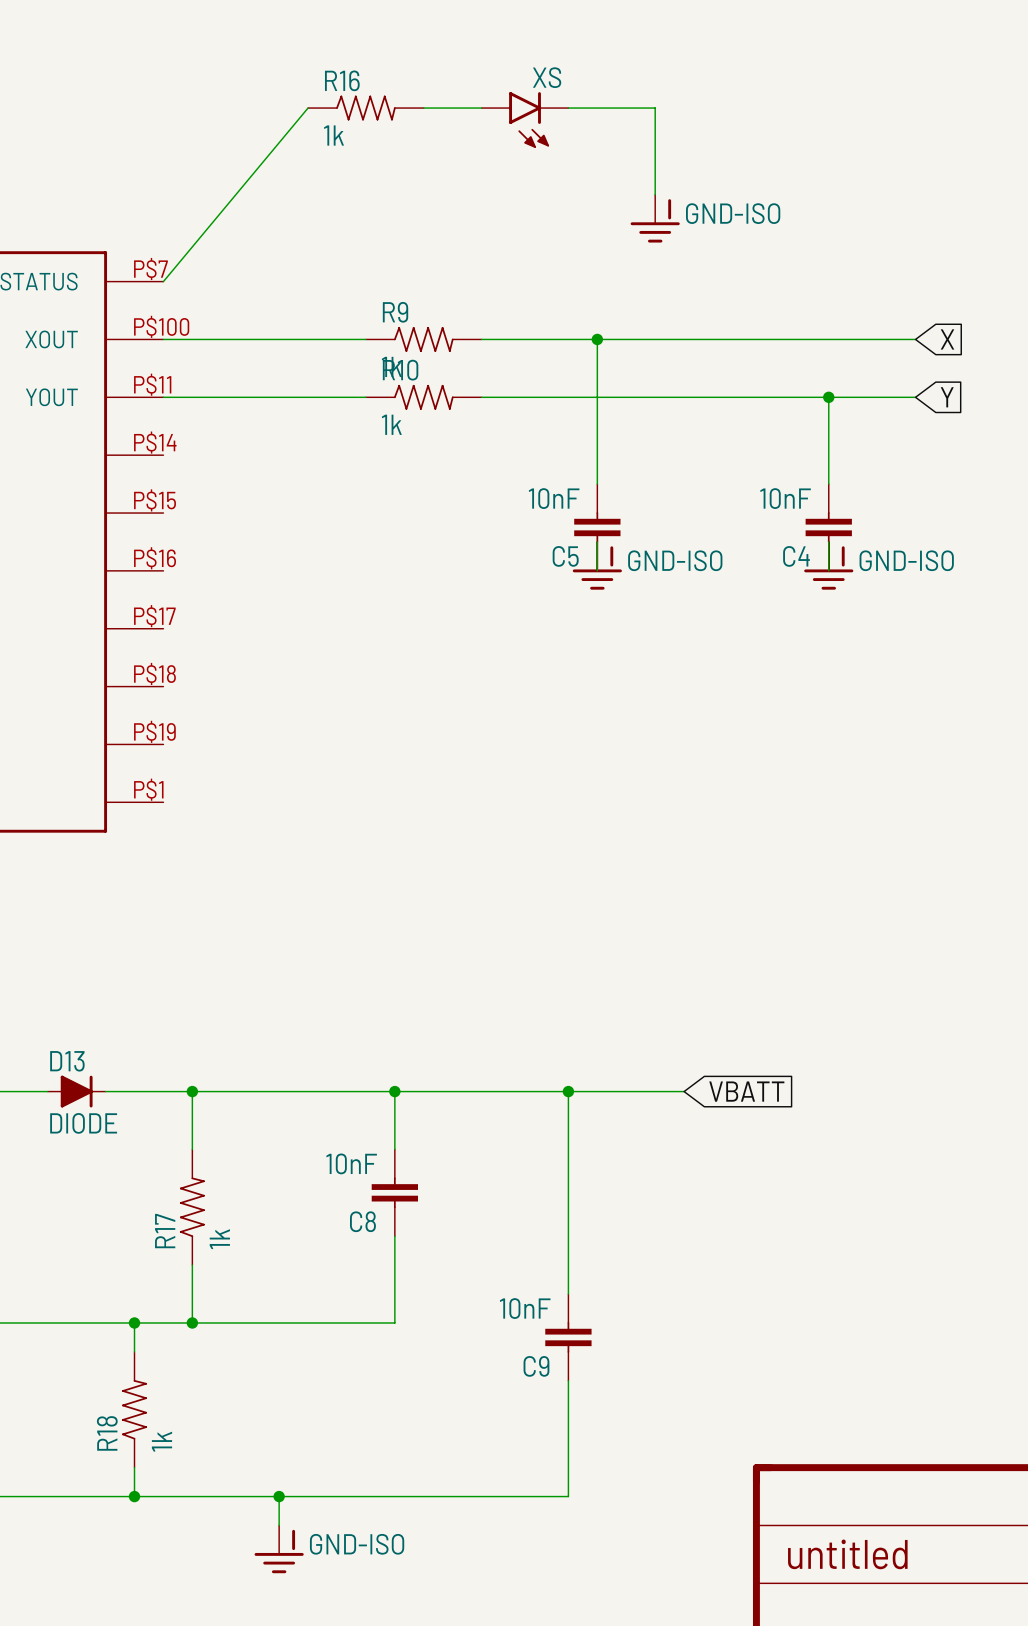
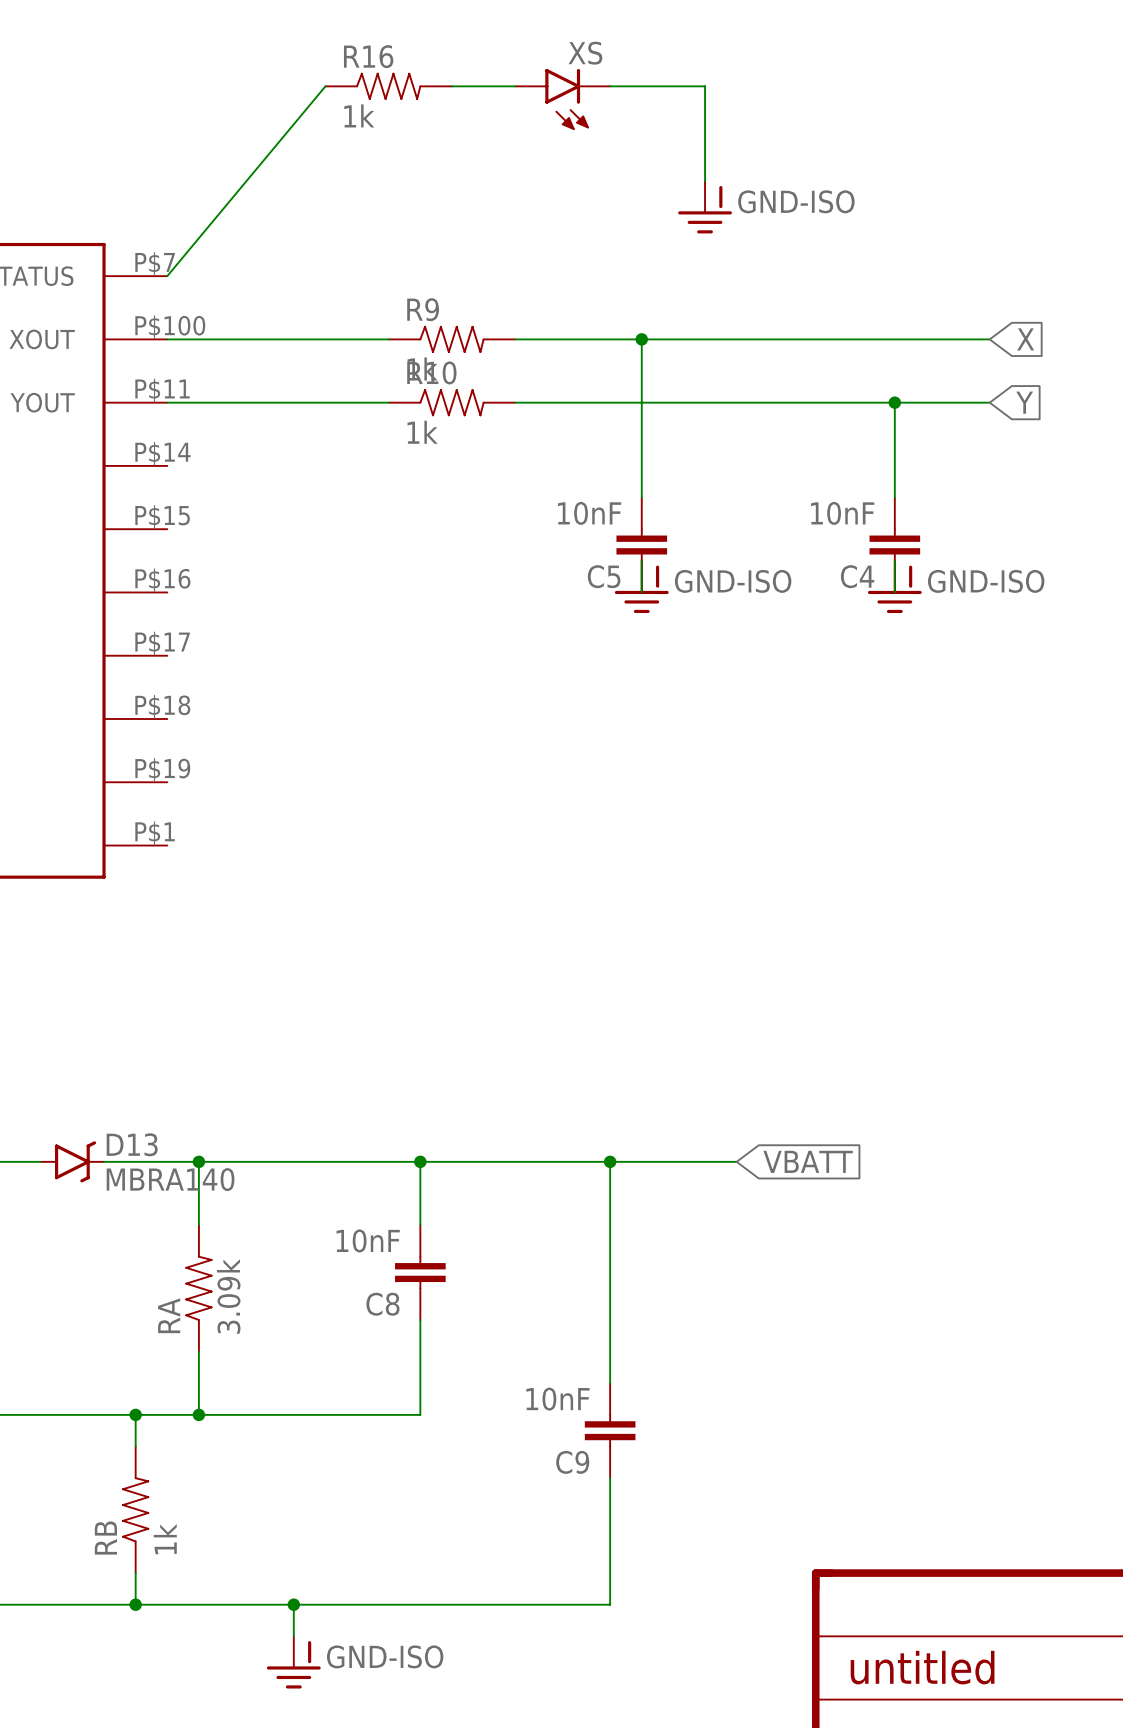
D13 name position: D13 (67, 1061) -> D13 (132, 1144)
D13 symbol: [47, 1075, 106, 1108] -> [39, 1141, 105, 1183]
D13 value: DIODE (83, 1123) -> MBRA140 (170, 1179)
R17 name: R17 (165, 1231) -> RA (169, 1315)
R17 value: 1k (219, 1239) -> 3.09k (228, 1296)
R18 name: R18 (107, 1433) -> RB (105, 1538)

